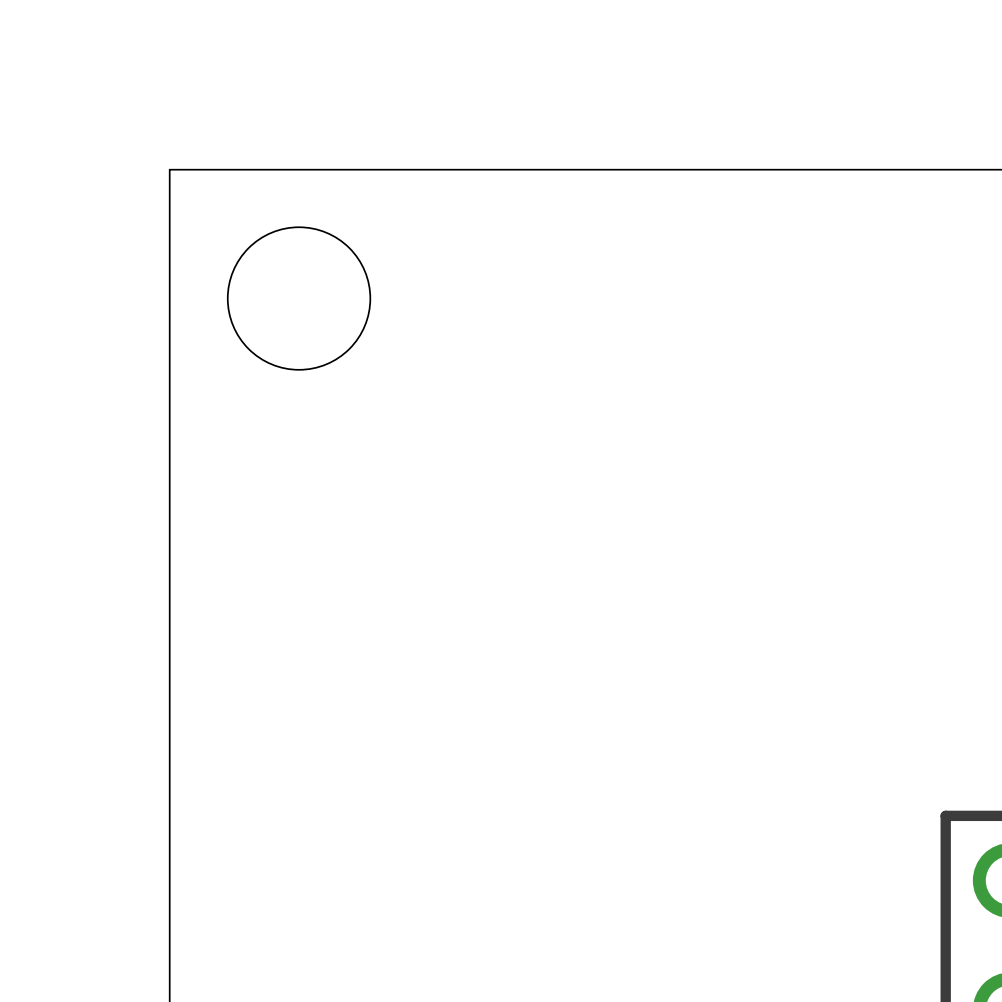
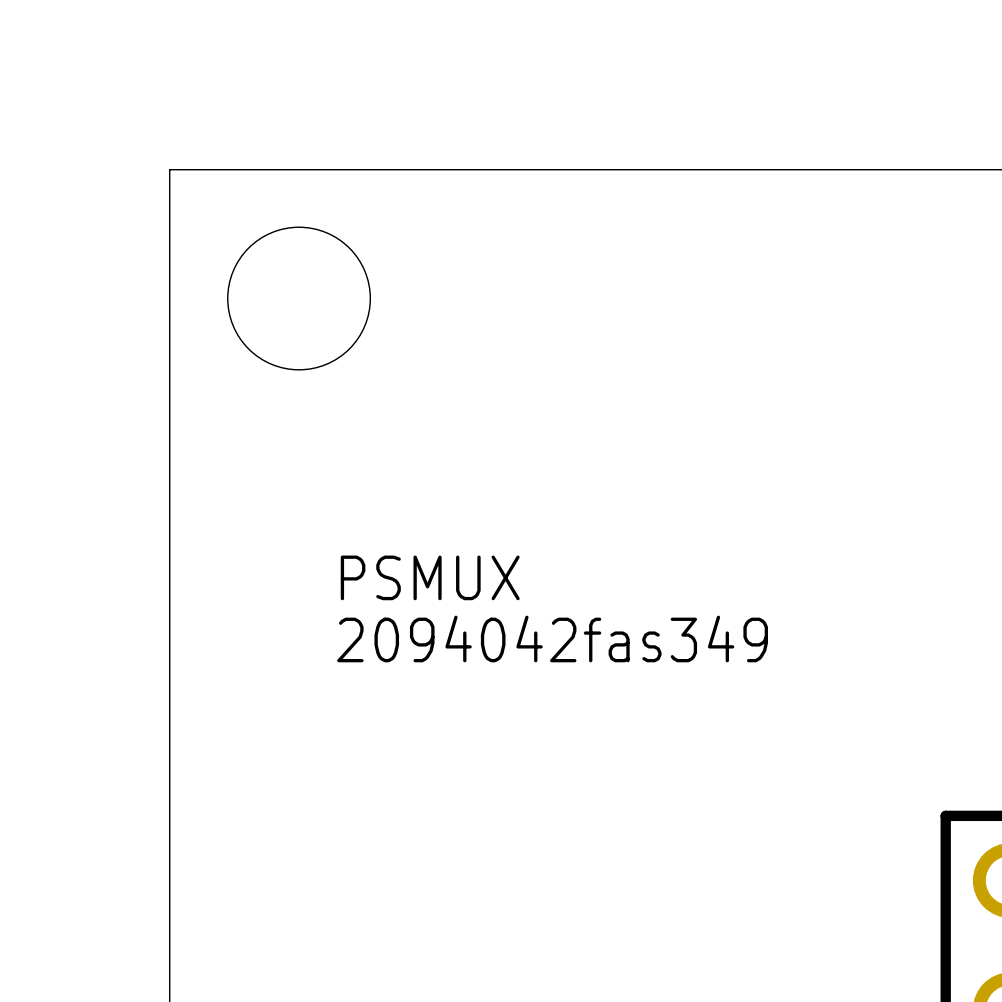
text: none -> PSMUX (430, 577)
text: none -> 2094042fas349 (552, 638)

